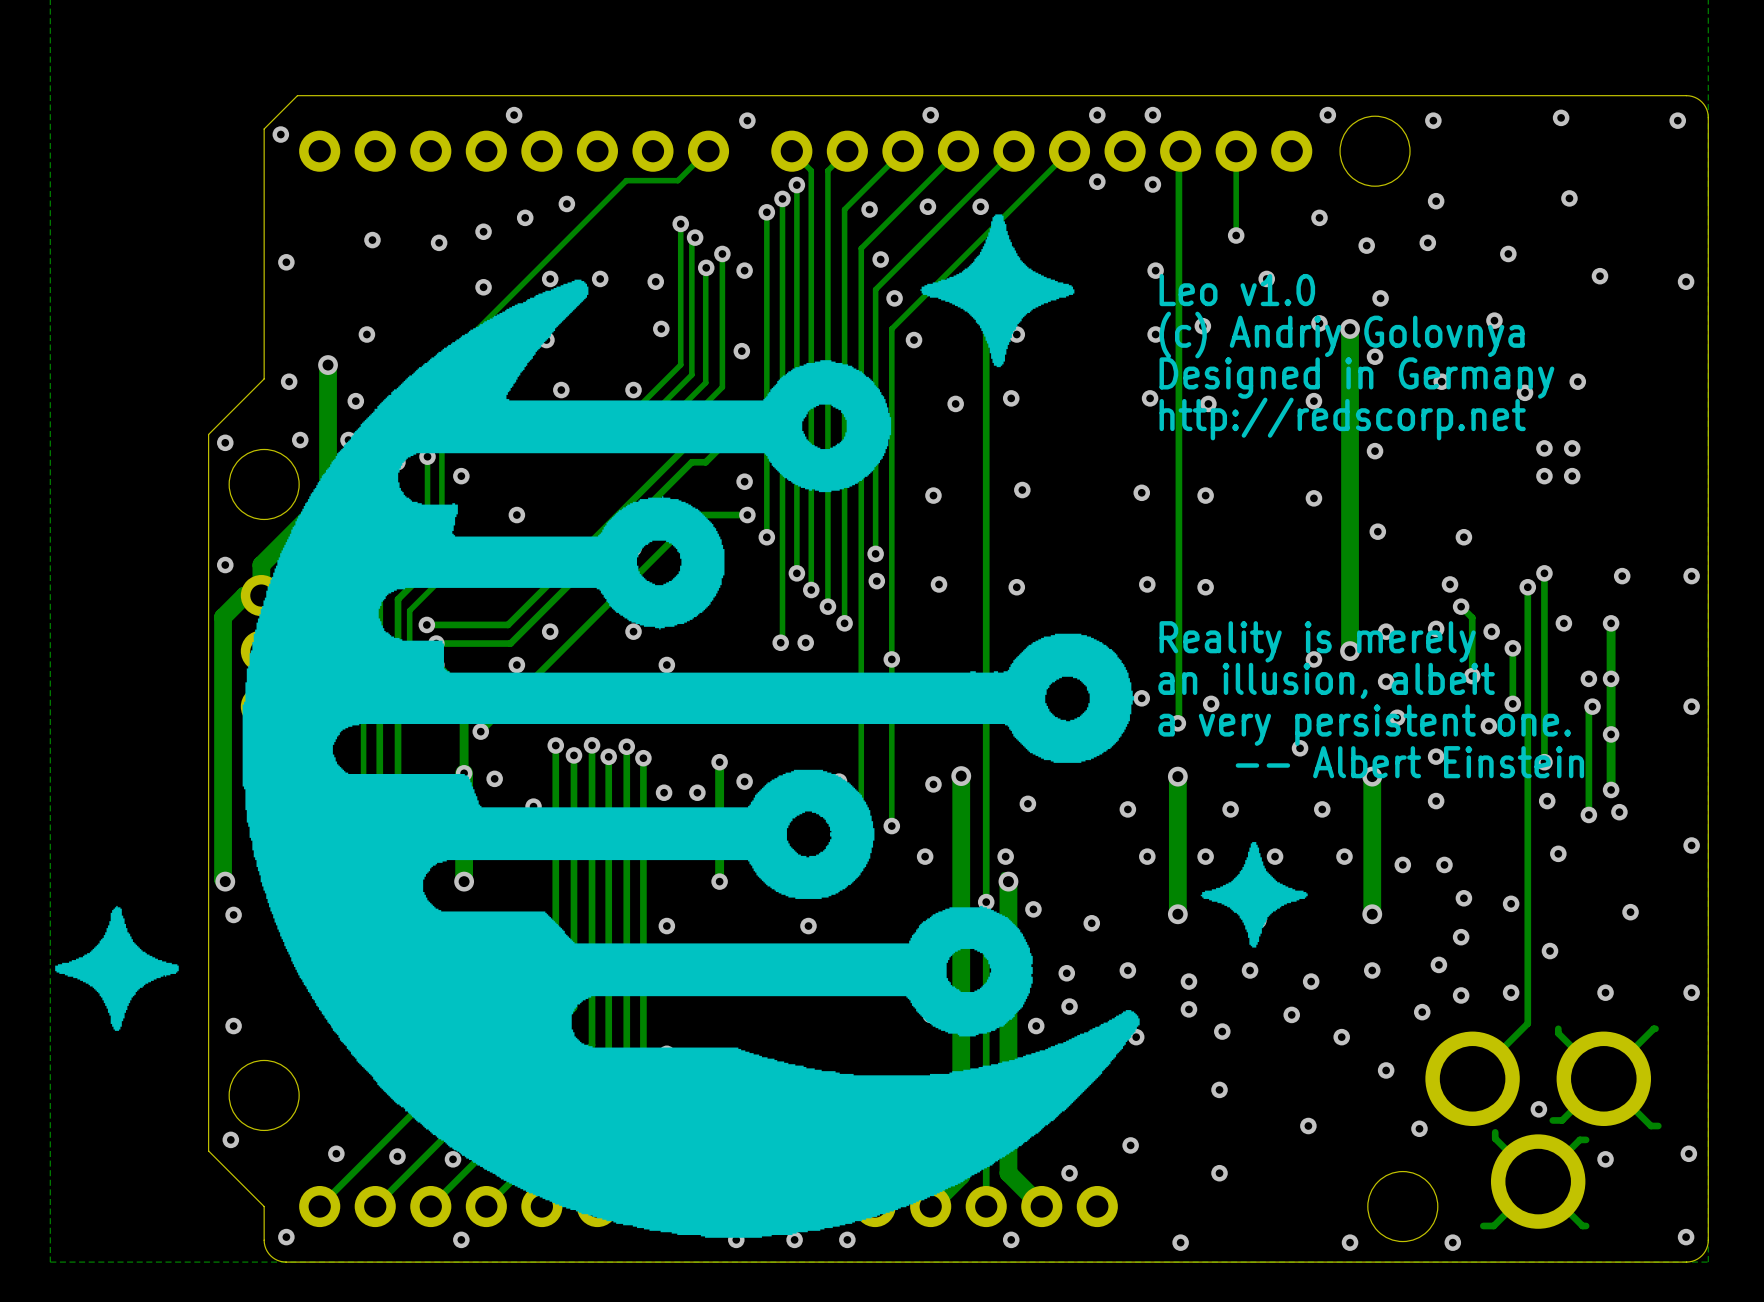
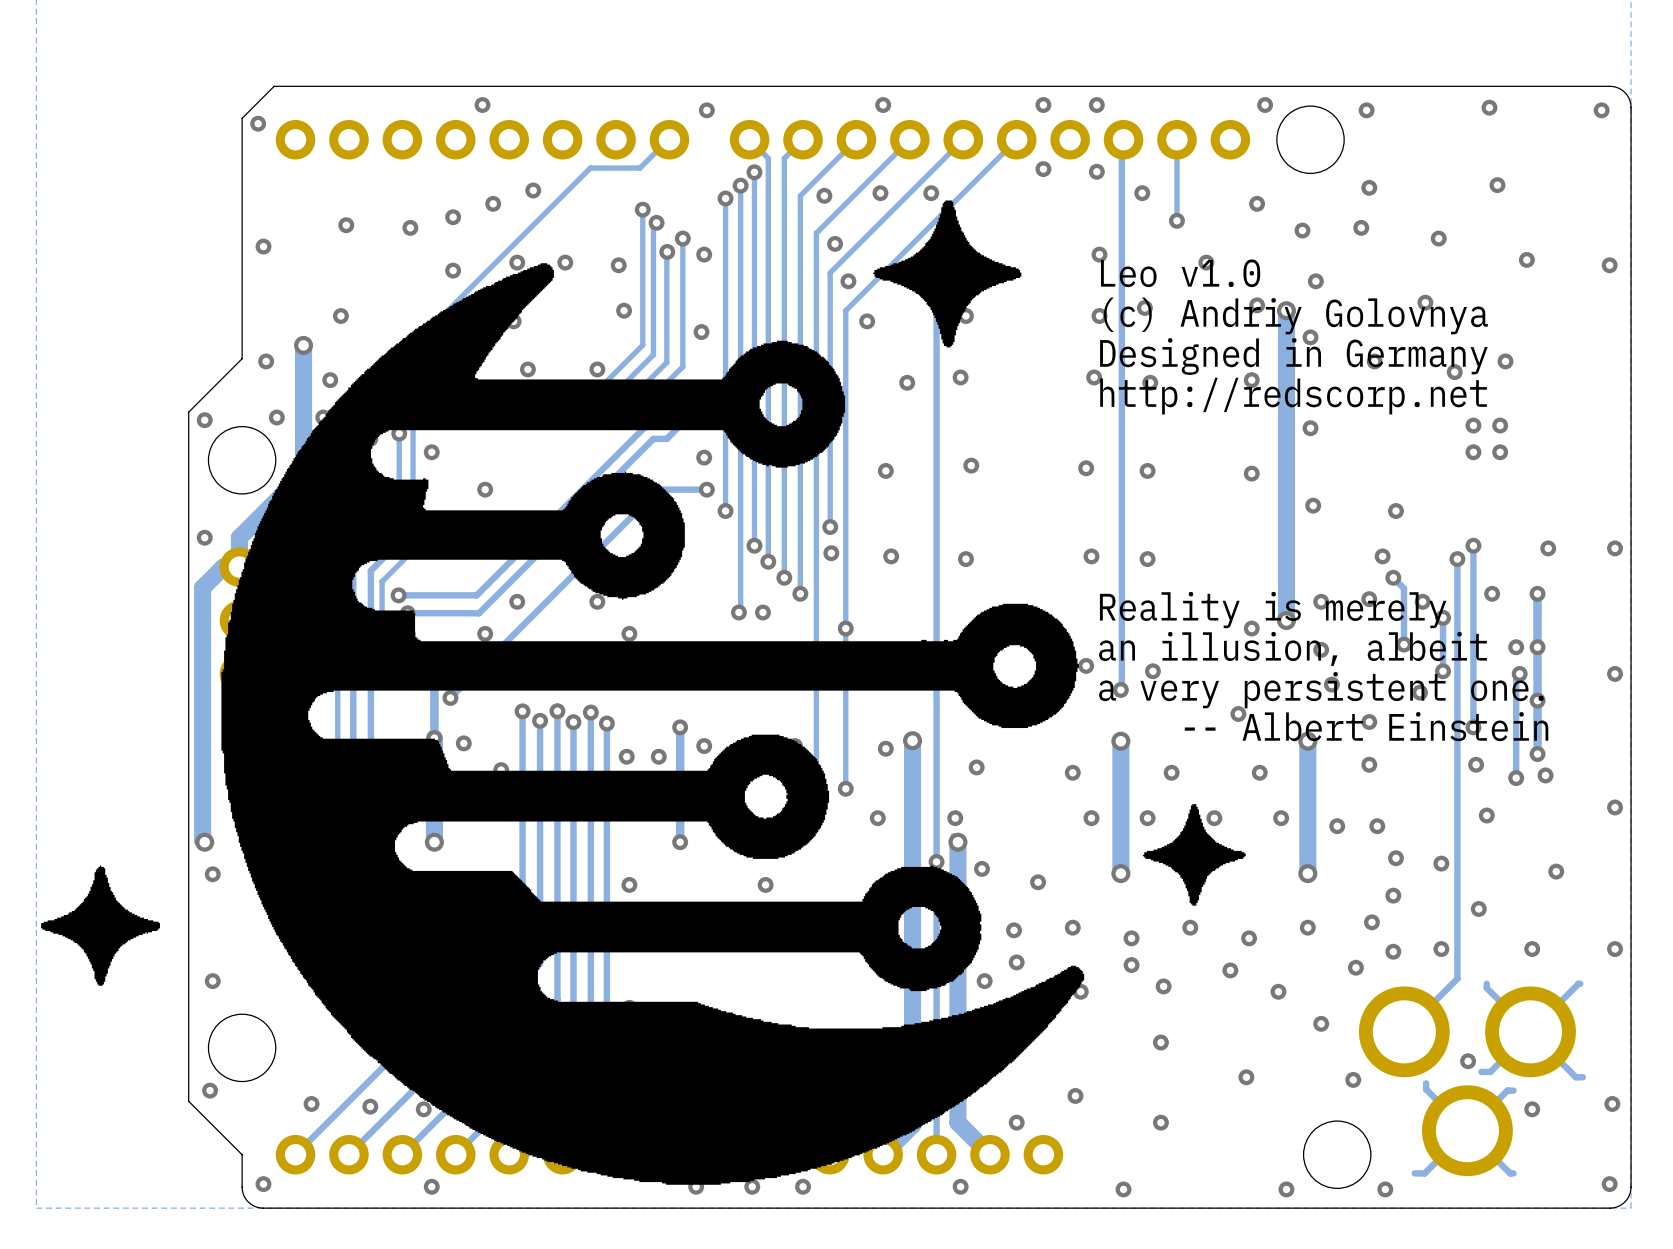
via: none -> (1142, 193)

